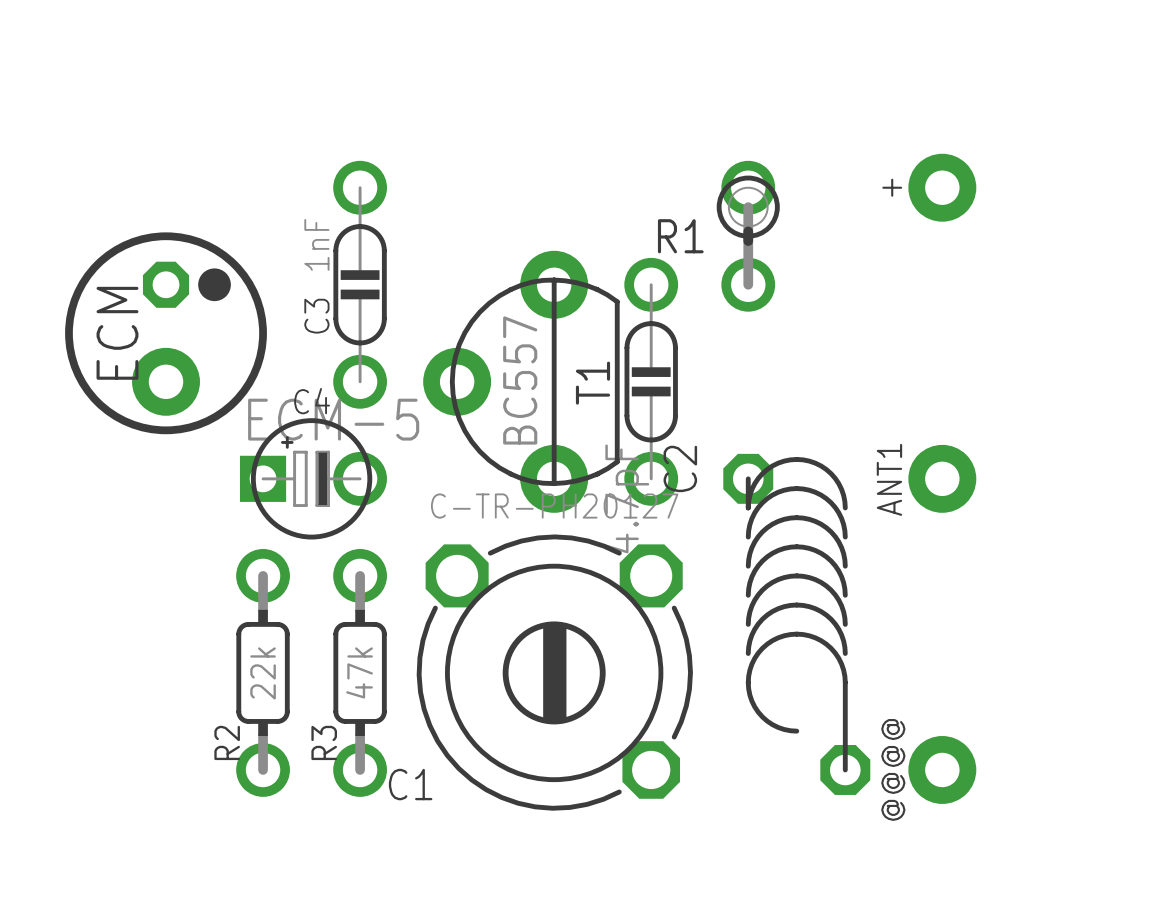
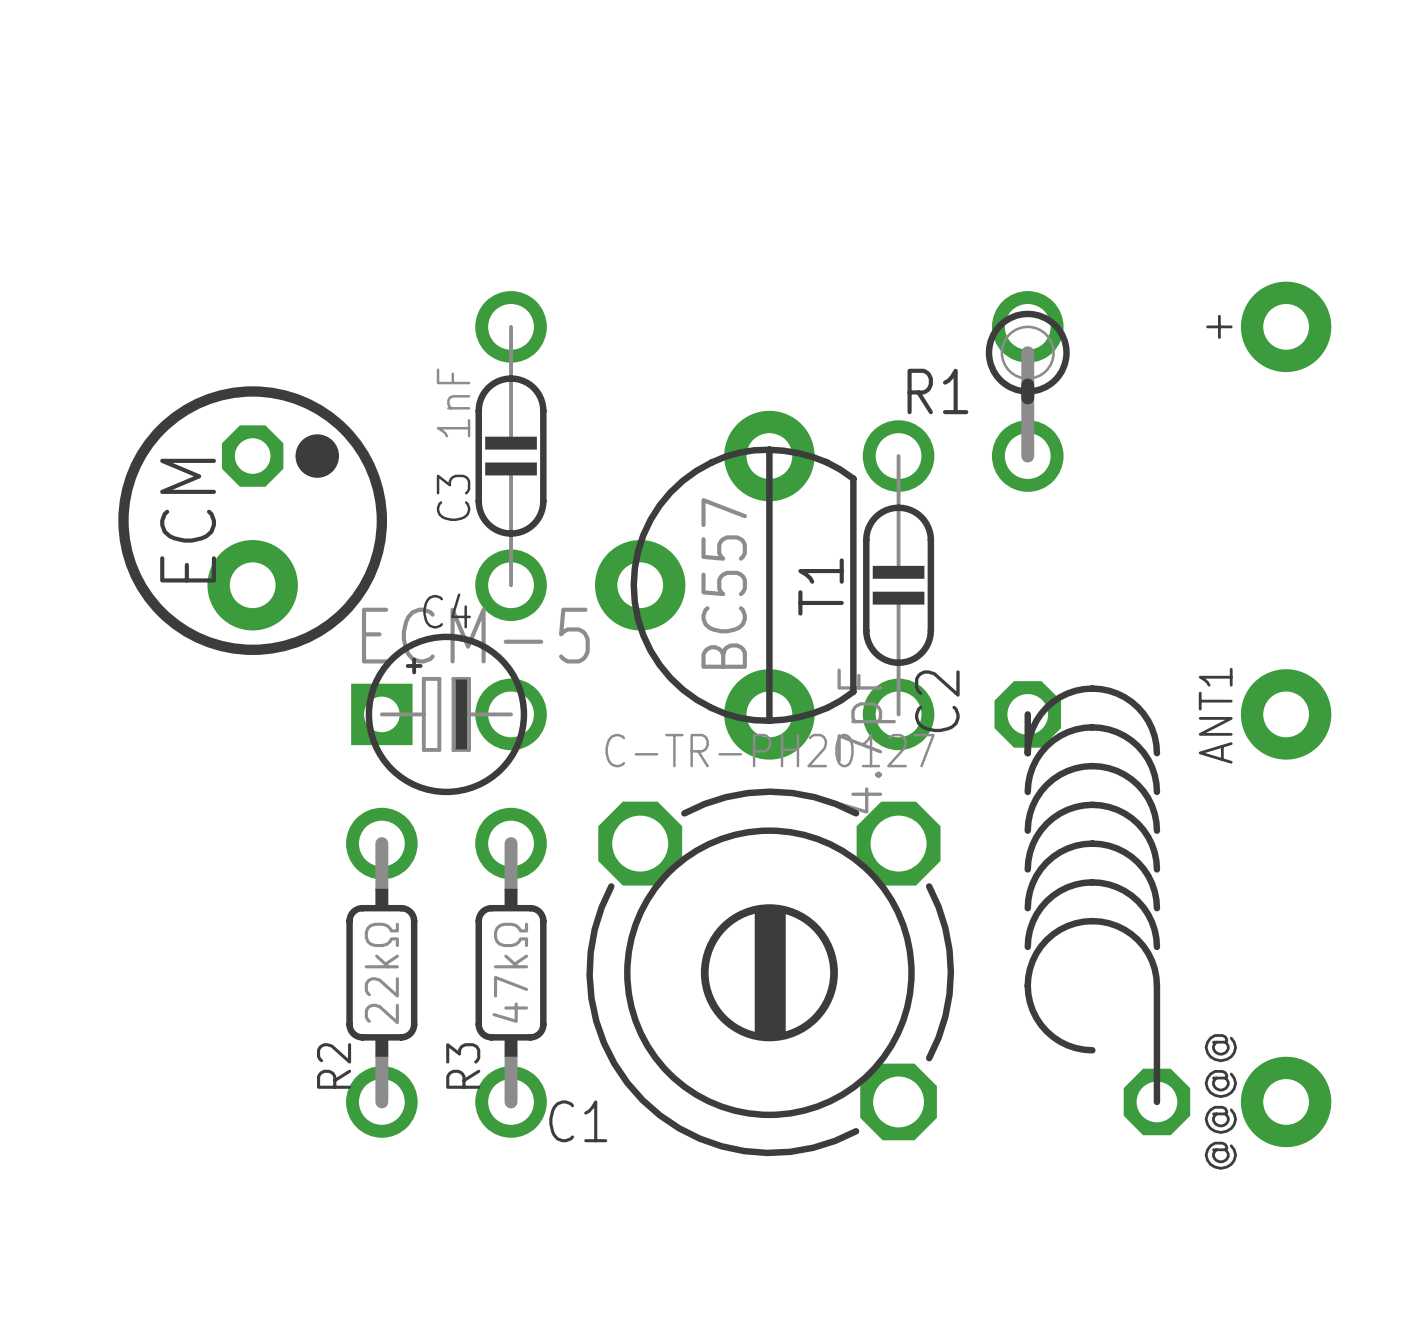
R3 value: 47k (359, 672) -> 47kΩ (510, 972)
R2 value: 22k (263, 673) -> 22kΩ (381, 973)

